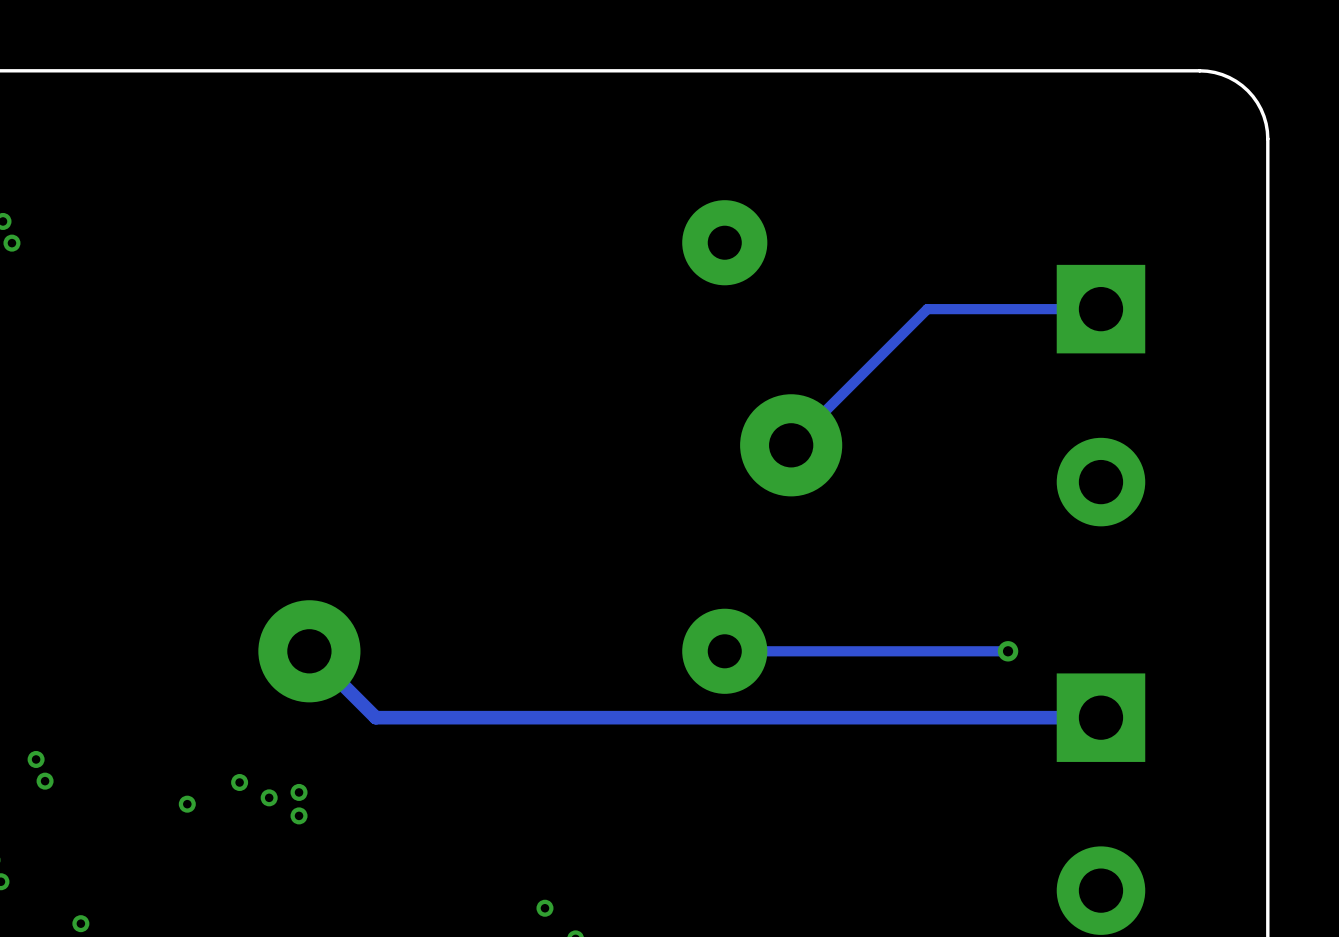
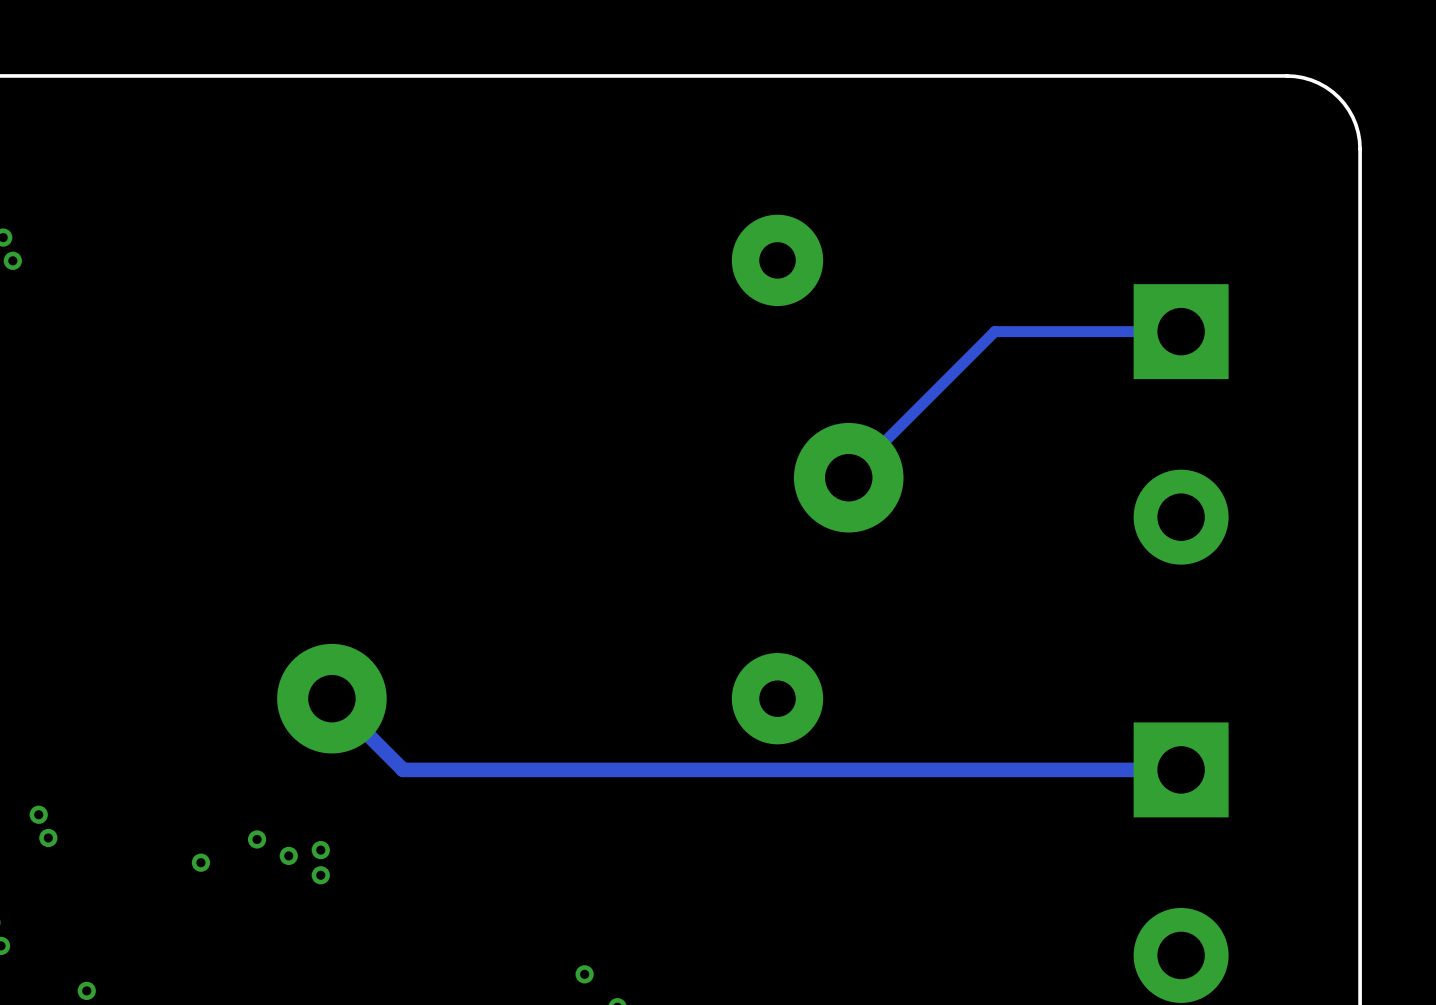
track: (1008, 651) (724, 651) -> none
via: (1008, 651) -> none

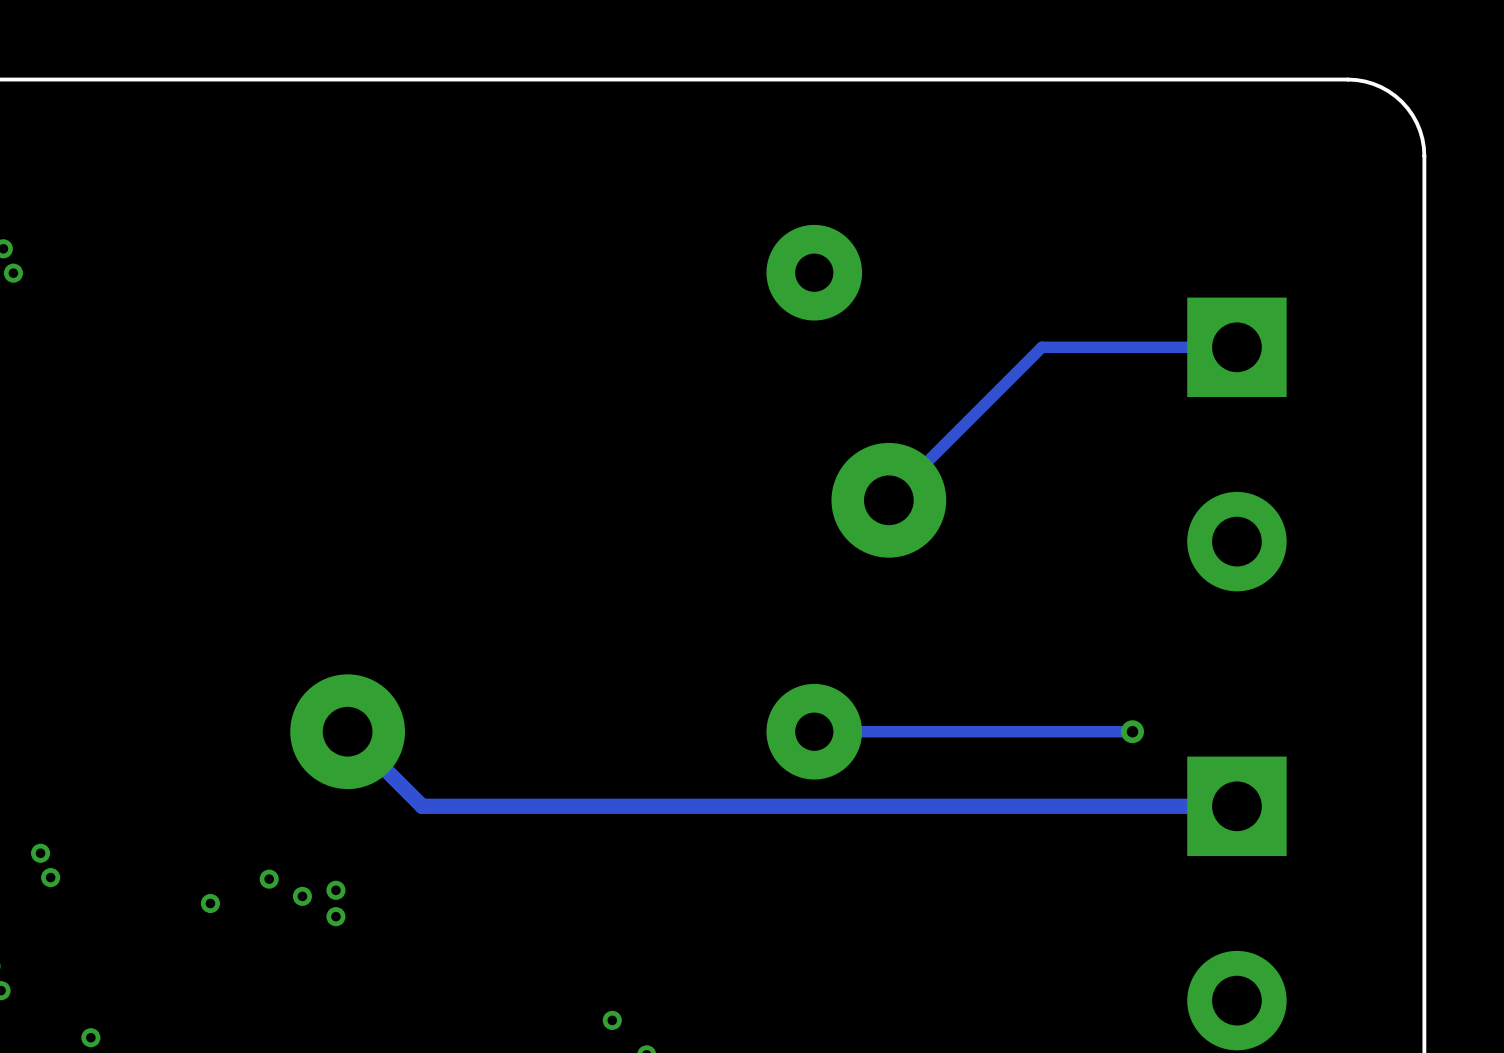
track: none -> (1132, 731) (814, 731)
via: none -> (1132, 731)

